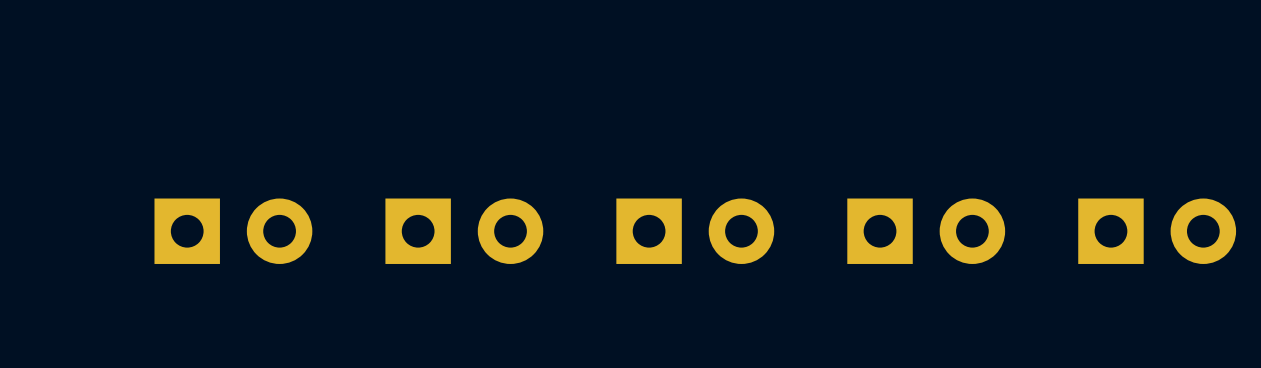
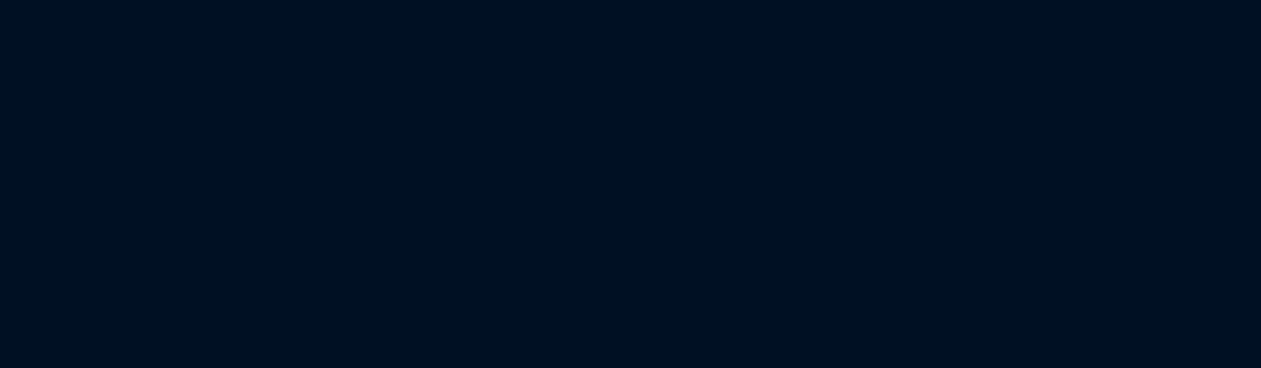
part: (233, 231) -> none
part: (464, 231) -> none
part: (695, 231) -> none
part: (926, 231) -> none
part: (1157, 231) -> none

